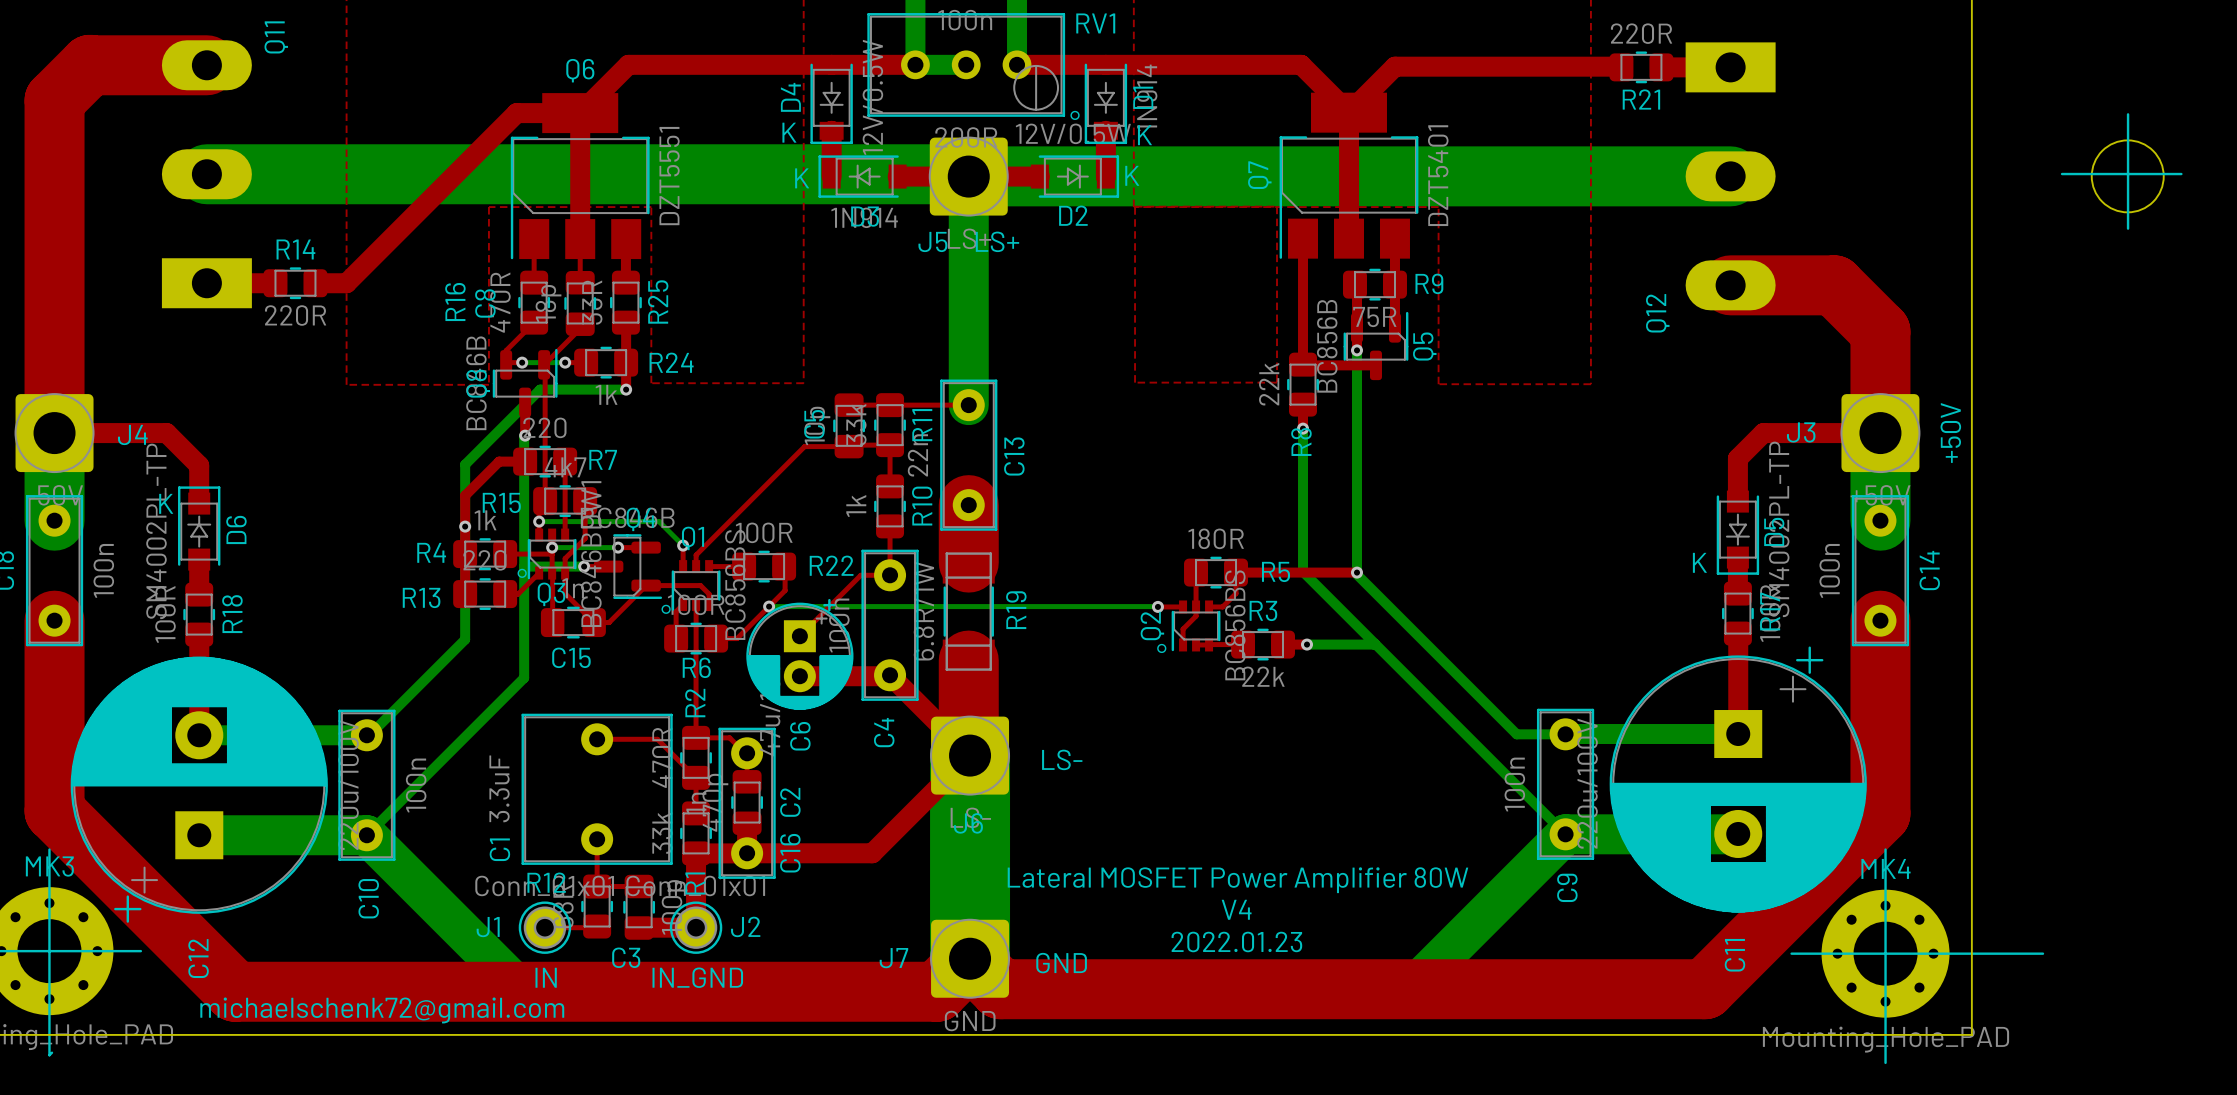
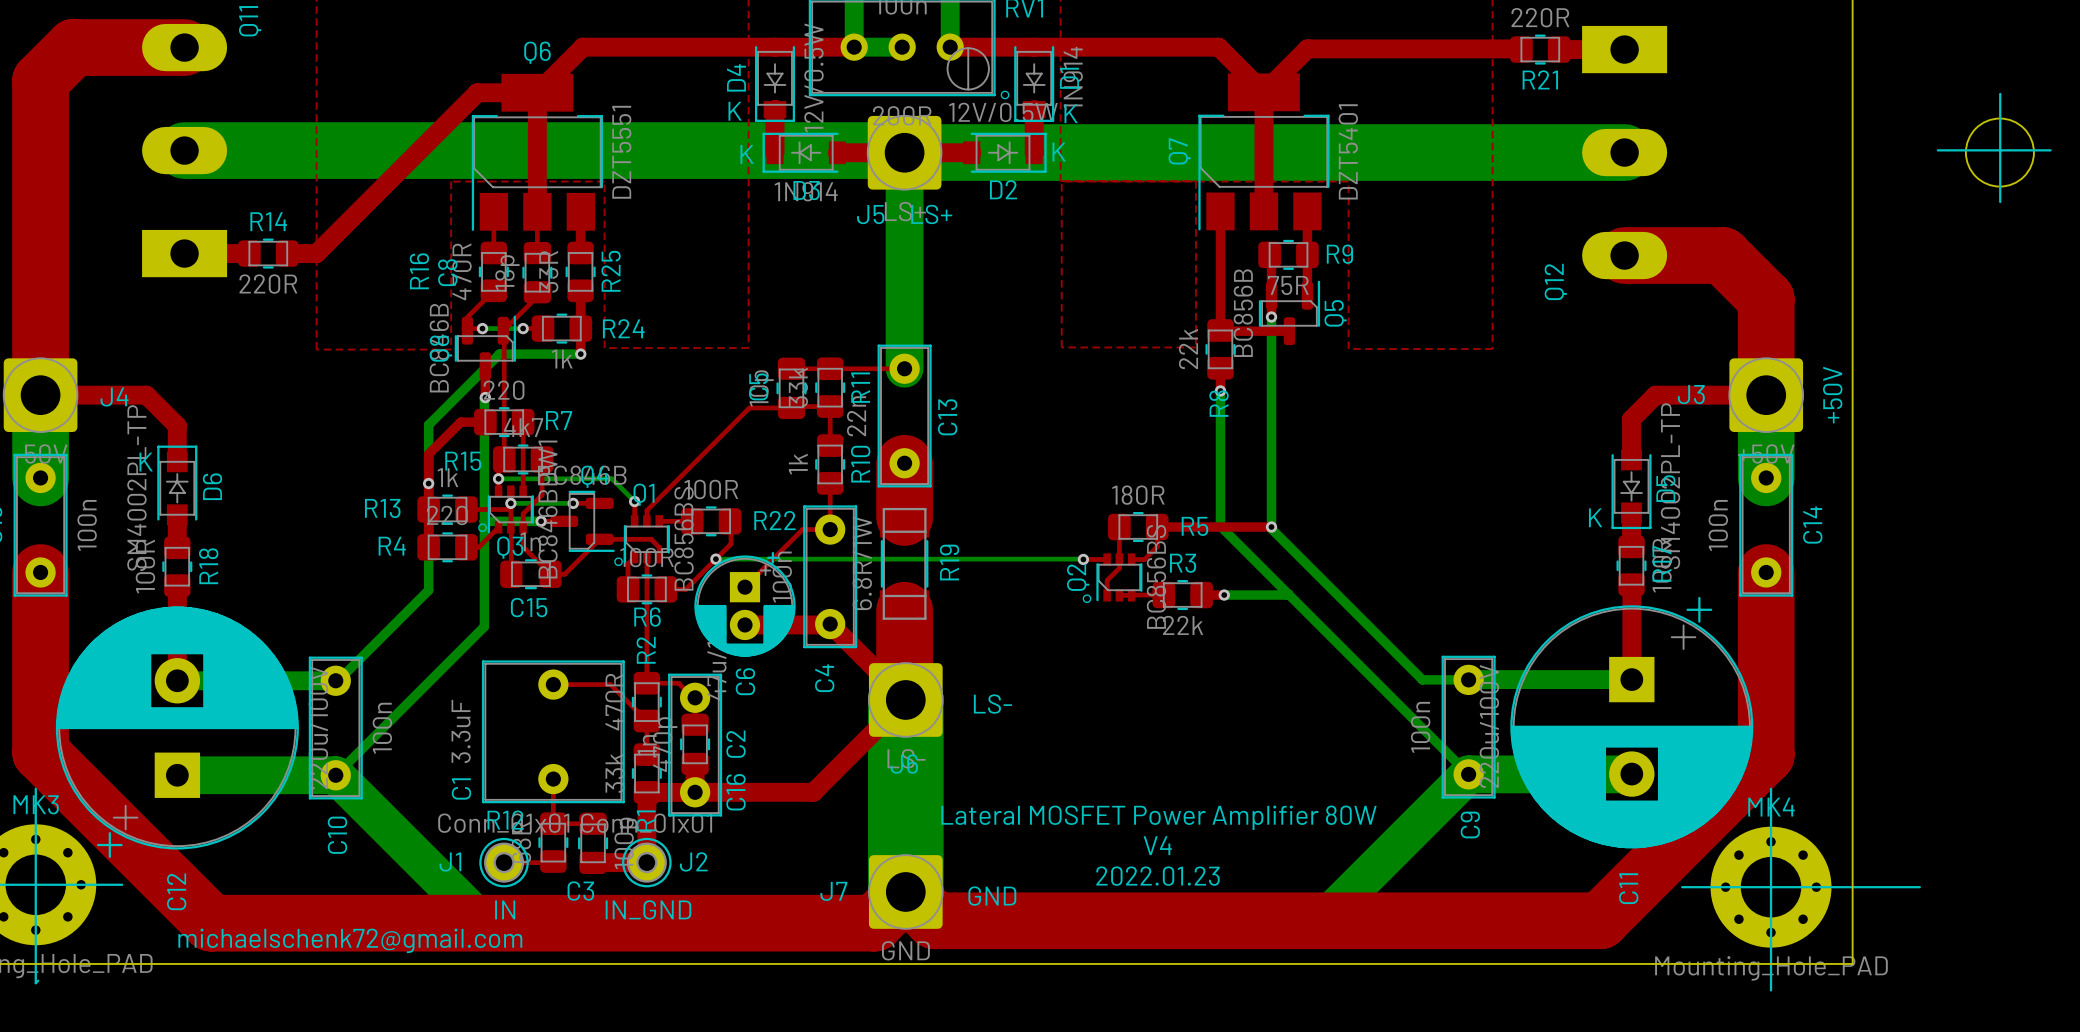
R4 name position: R4 (431, 552) -> R4 (392, 546)
R13 name position: R13 (421, 597) -> R13 (382, 508)

